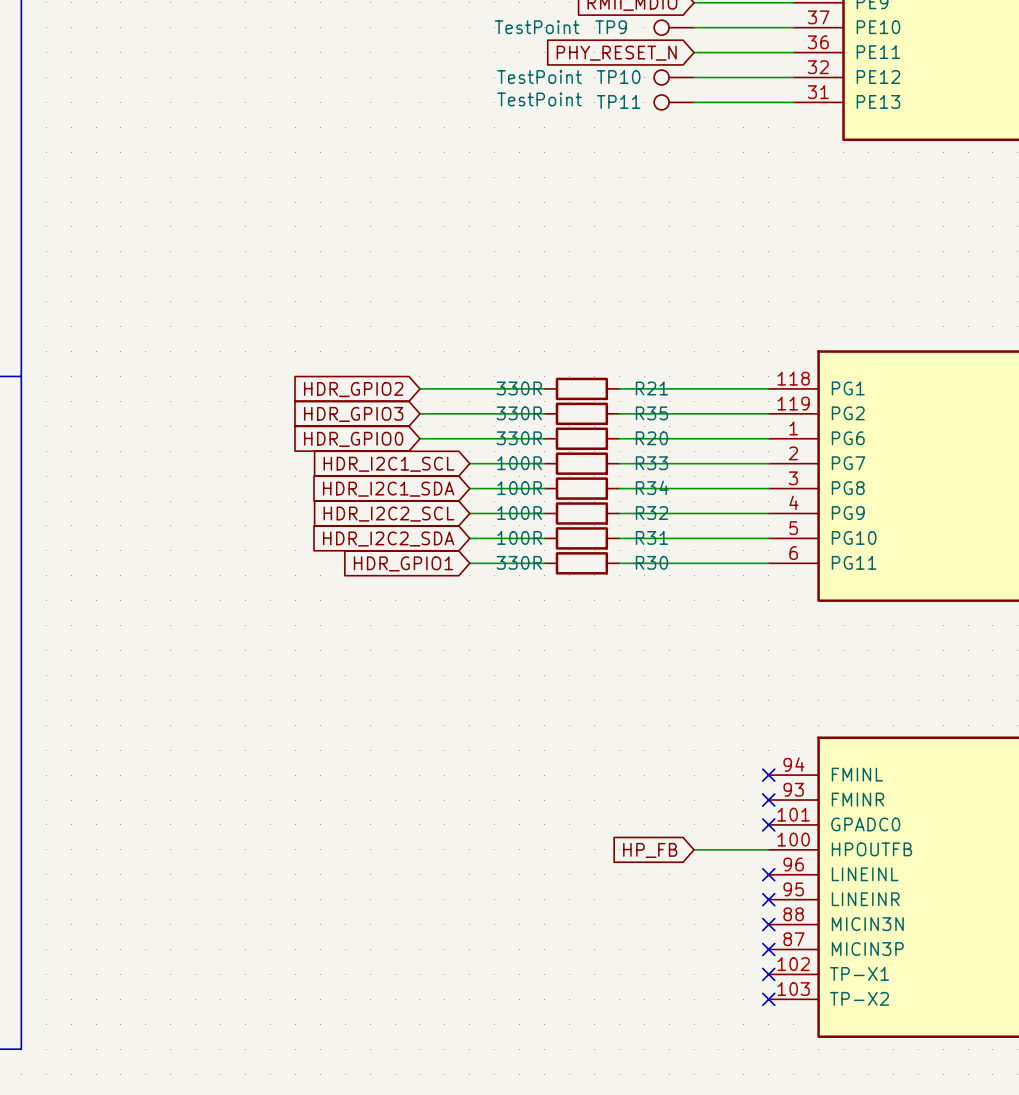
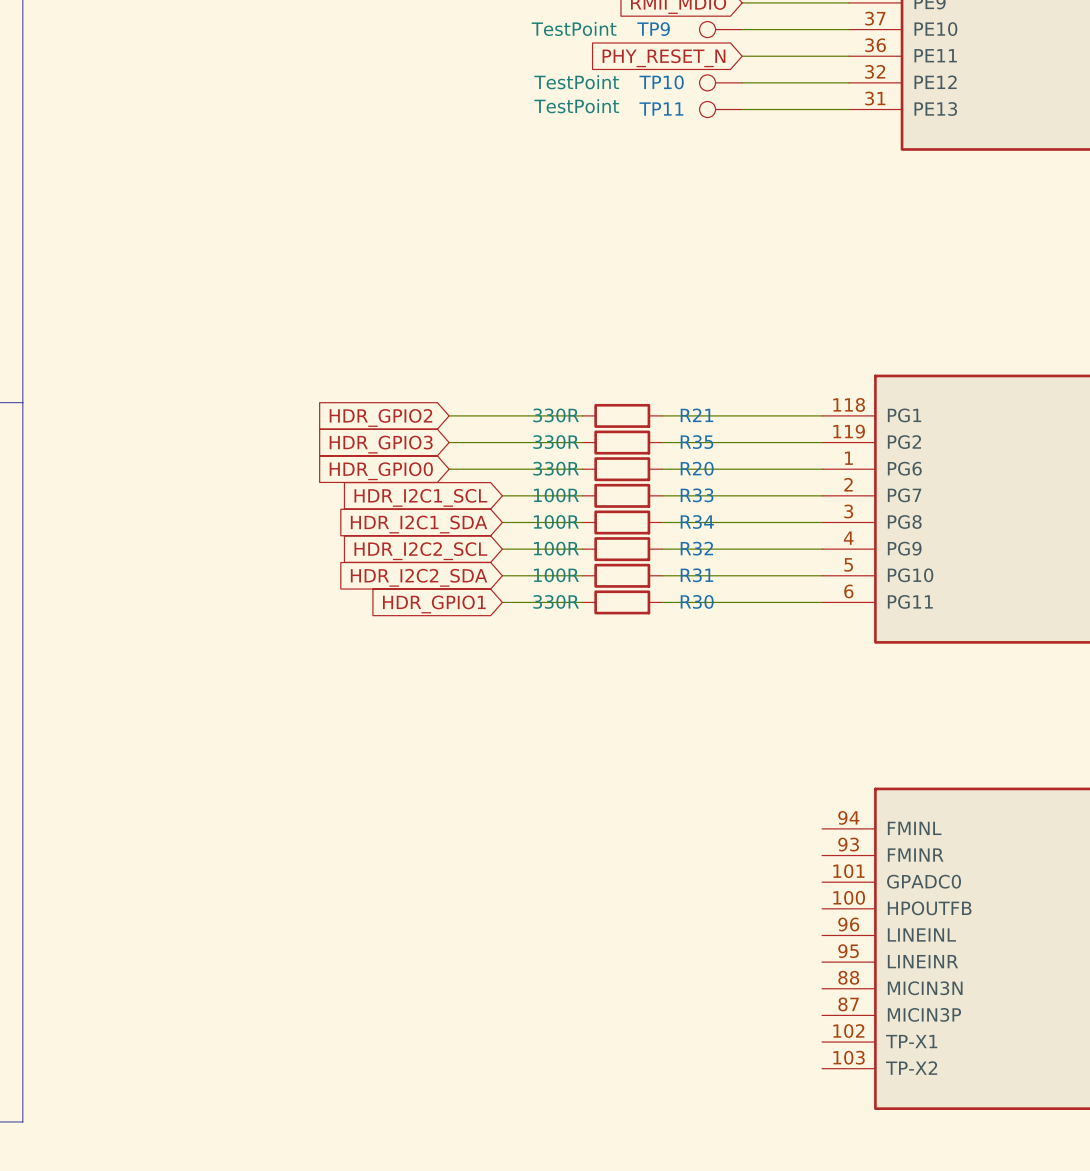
no-connect mark: (768, 775) -> none
no-connect mark: (768, 800) -> none
no-connect mark: (768, 824) -> none
wire: (694, 849) (768, 849) -> none
global label: HP_FB (650, 850) -> none
no-connect mark: (768, 874) -> none
no-connect mark: (768, 899) -> none
no-connect mark: (768, 924) -> none
no-connect mark: (768, 949) -> none
no-connect mark: (768, 974) -> none
no-connect mark: (768, 999) -> none

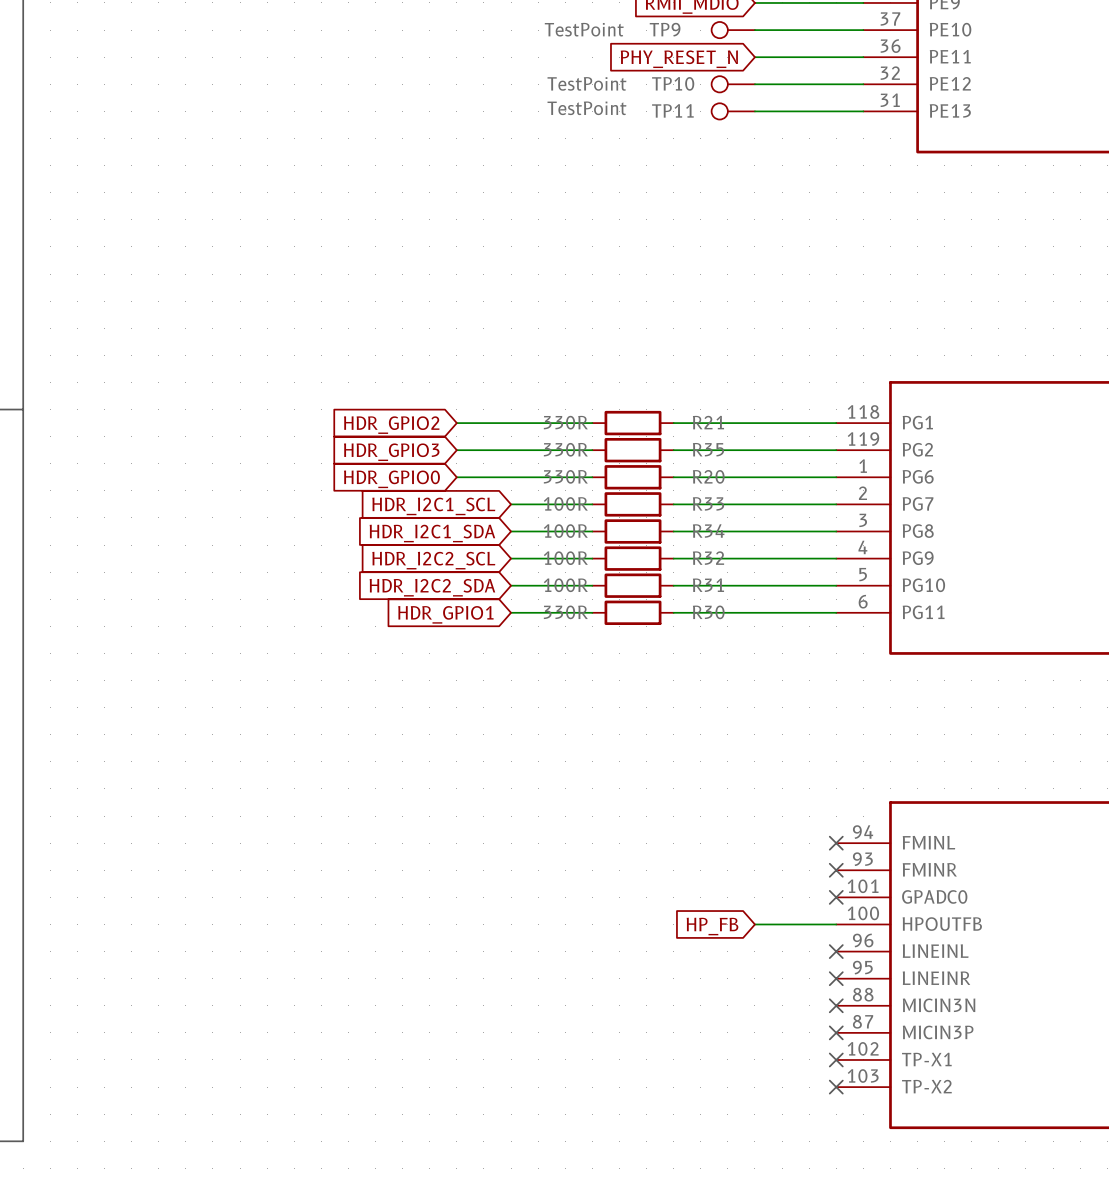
no-connect mark: none -> (836, 843)
no-connect mark: none -> (836, 870)
no-connect mark: none -> (836, 897)
wire: none -> (754, 924) (836, 924)
global label: none -> HP_FB (712, 926)
no-connect mark: none -> (836, 951)
no-connect mark: none -> (836, 978)
no-connect mark: none -> (836, 1005)
no-connect mark: none -> (836, 1032)
no-connect mark: none -> (836, 1059)
no-connect mark: none -> (836, 1087)

